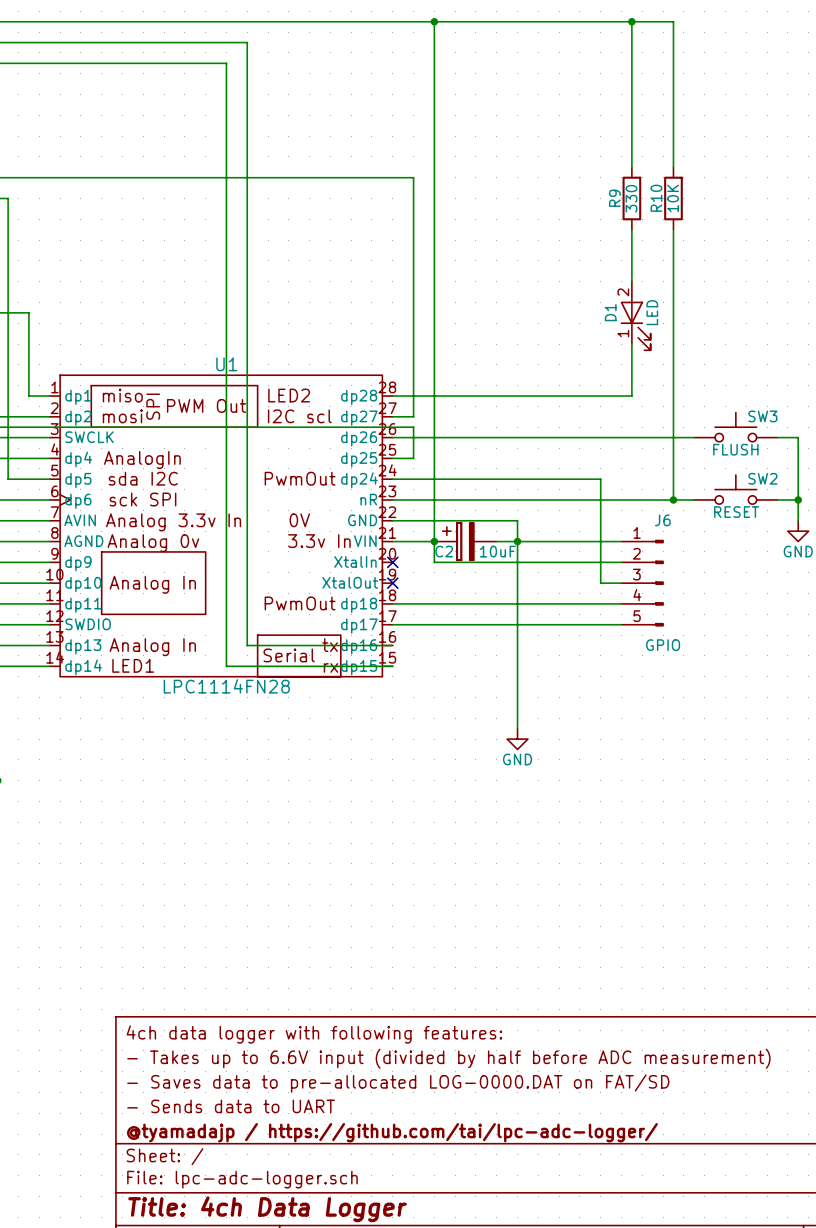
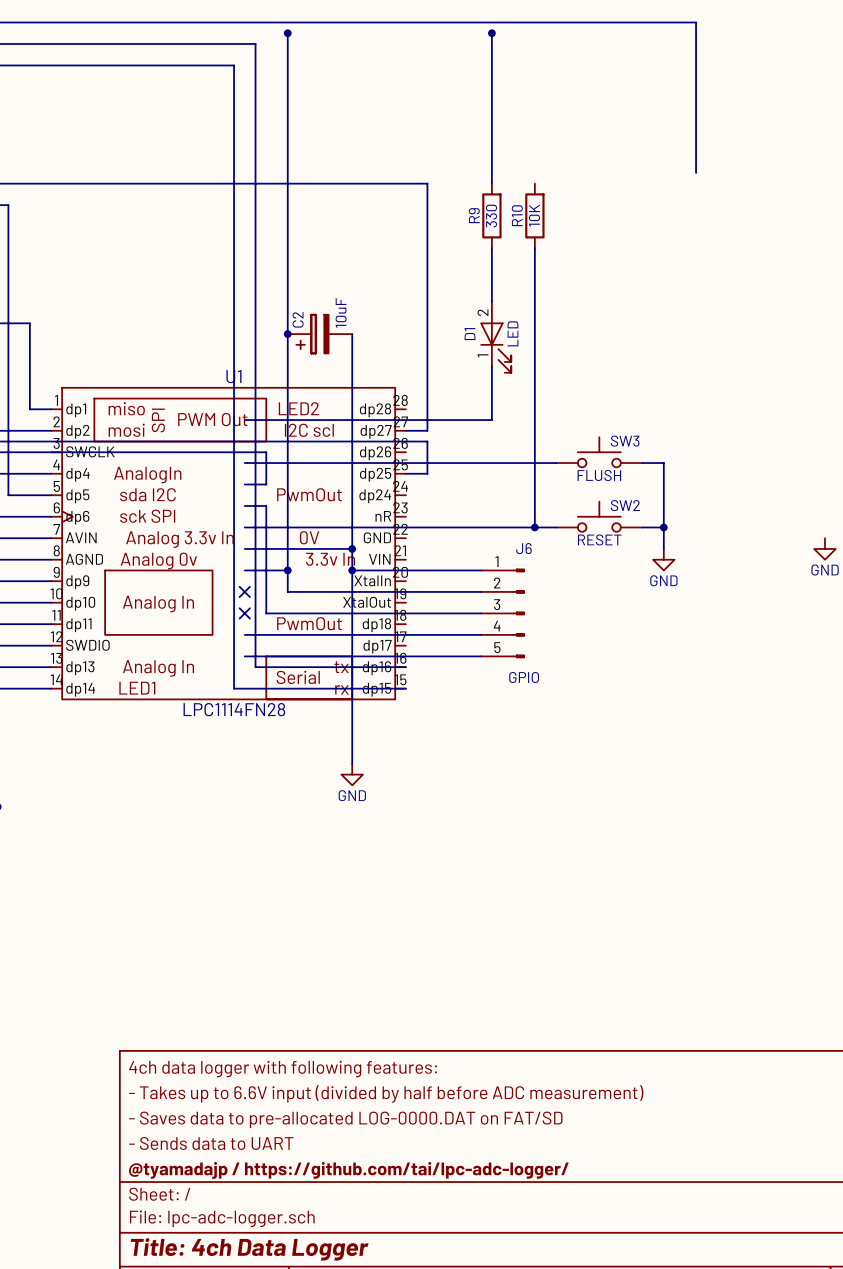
wire: (434, 21) (434, 562) (621, 562) -> (287, 33) (287, 591) (481, 591)
junction position: (434, 21) -> (491, 33)
wire: (631, 21) (631, 167) -> (491, 33) (491, 183)
junction: (631, 21) -> none
junction: none -> (287, 33)
R9 position: (631, 198) -> (491, 215)
R10 position: (673, 198) -> (534, 215)
wire: (631, 229) (631, 281) -> (491, 248) (491, 301)
wire: (673, 229) (673, 499) -> (534, 248) (534, 527)
D1 position: (635, 315) -> (495, 337)
junction: none -> (287, 334)
wire: none -> (352, 334) (352, 763)
wire: (631, 344) (631, 396) (392, 396) -> (491, 366) (491, 420) (244, 420)
SW3 position: (735, 427) -> (599, 452)
wire: none -> (51, 452) (266, 452) (266, 484) (244, 484)
wire: (392, 437) (694, 437) -> (244, 463) (556, 463)
wire: (777, 437) (798, 437) (798, 520) -> (642, 463) (663, 463) (663, 548)
wire: (392, 479) (600, 479) (600, 583) (621, 583) -> none
wire: none -> (244, 505) (266, 505) (266, 613) (481, 613)
SW2 position: (735, 489) -> (599, 516)
wire: (392, 499) (694, 499) -> (244, 527) (556, 527)
junction position: (673, 499) -> (663, 527)
wire: (777, 499) (798, 499) -> (642, 527) (663, 527)
junction: (798, 499) -> none
wire: (392, 520) (517, 520) (517, 728) -> none
wire: none -> (244, 548) (352, 548)
junction: none -> (352, 548)
wire: (392, 541) (434, 541) -> (244, 570) (287, 570)
junction: (434, 541) -> none
C2 flip: as is (458, 541) -> up-down (312, 334)
C2 position: (465, 541) -> (319, 334)
wire: (496, 541) (621, 541) -> (352, 570) (481, 570)
junction position: (517, 541) -> (534, 527)
power symbol: none -> GND (663, 559)
junction: none -> (287, 570)
junction: none -> (352, 570)
C2 value position: 10uF (497, 551) -> 10uF (341, 312)
no-connect mark: (392, 562) -> none
no-connect mark: none -> (244, 591)
no-connect mark: (392, 583) -> none
J6 position: (642, 583) -> (502, 613)
no-connect mark: none -> (244, 613)
wire: (392, 603) (621, 603) -> (244, 634) (481, 634)
wire: (392, 624) (621, 624) -> (244, 656) (481, 656)
power symbol: GND (517, 739) -> none
power symbol: none -> GND (352, 774)

